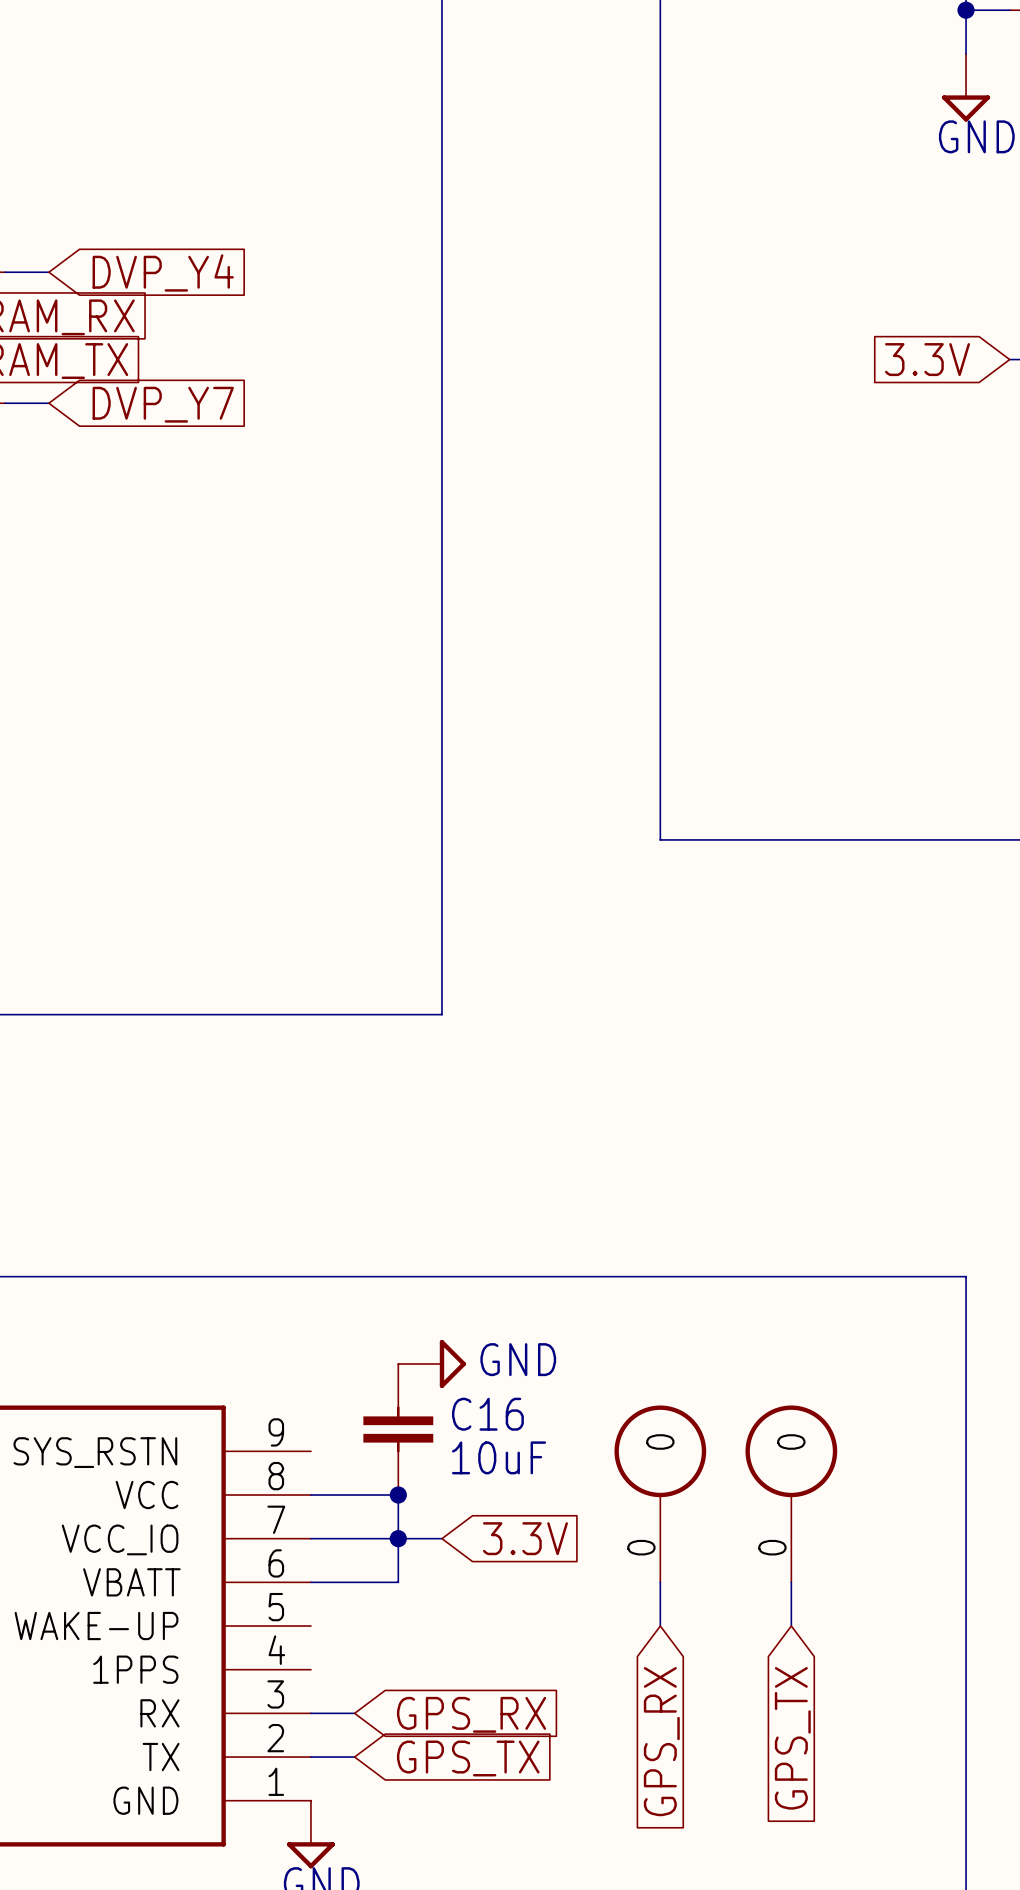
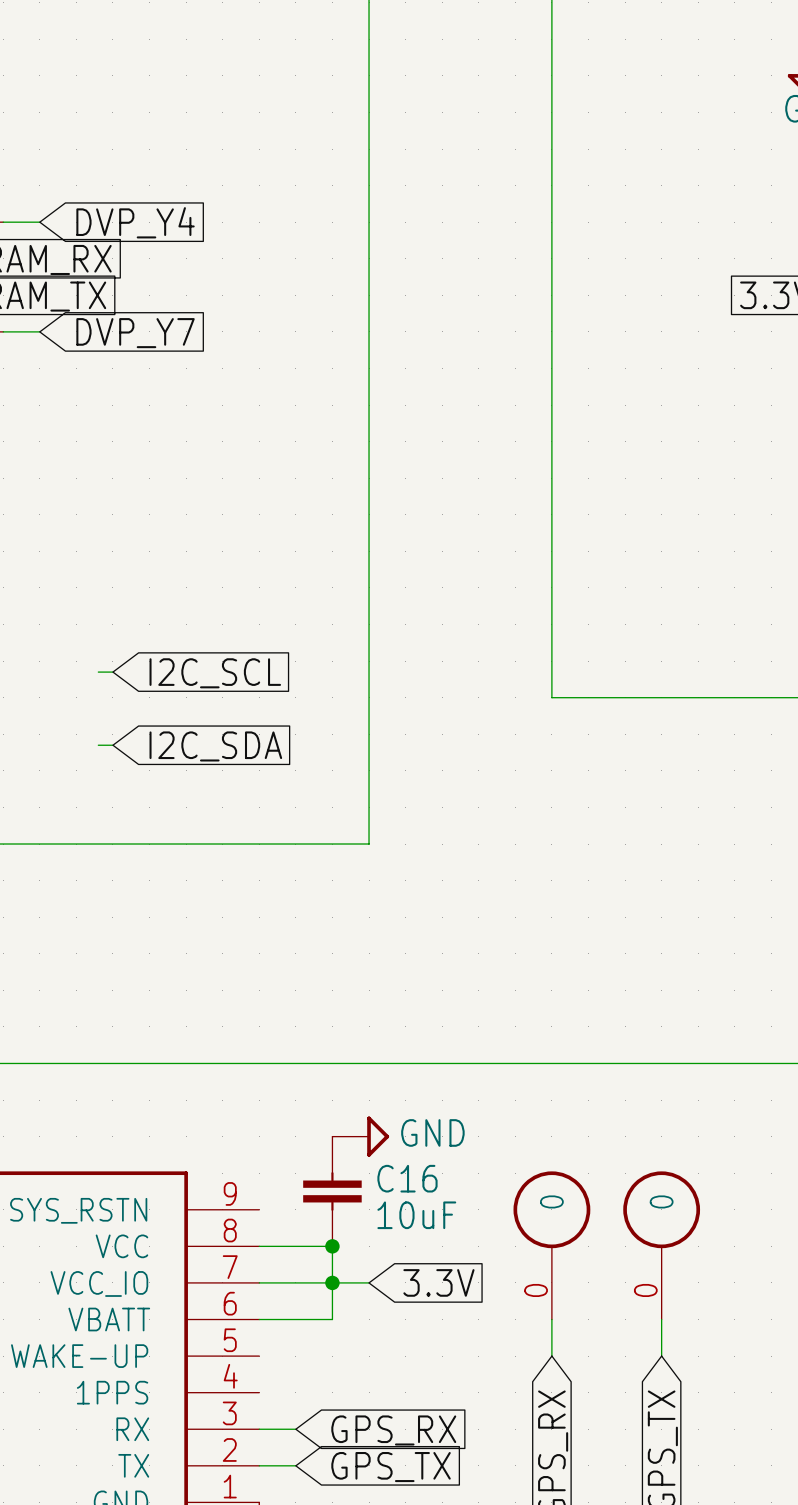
wire: none -> (98, 672) (112, 672)
global label: none -> I2C_SCL (215, 673)
wire: none -> (98, 745) (112, 745)
global label: none -> I2C_SDA (215, 746)

